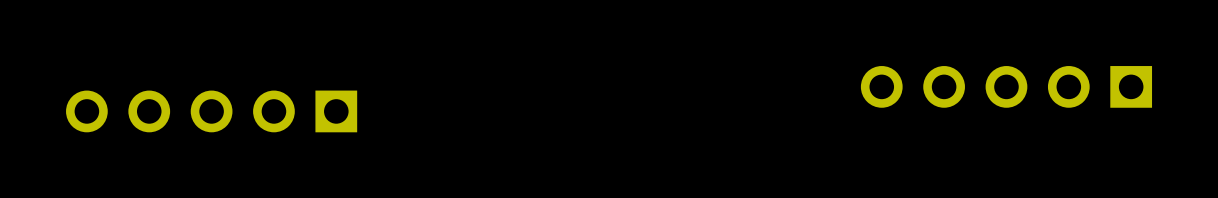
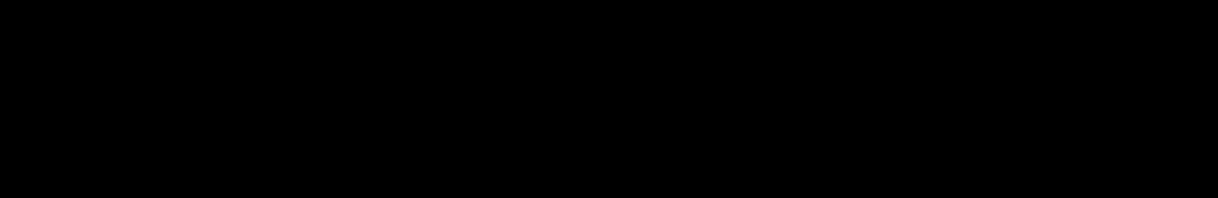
part: (1006, 86) -> none
part: (211, 111) -> none

